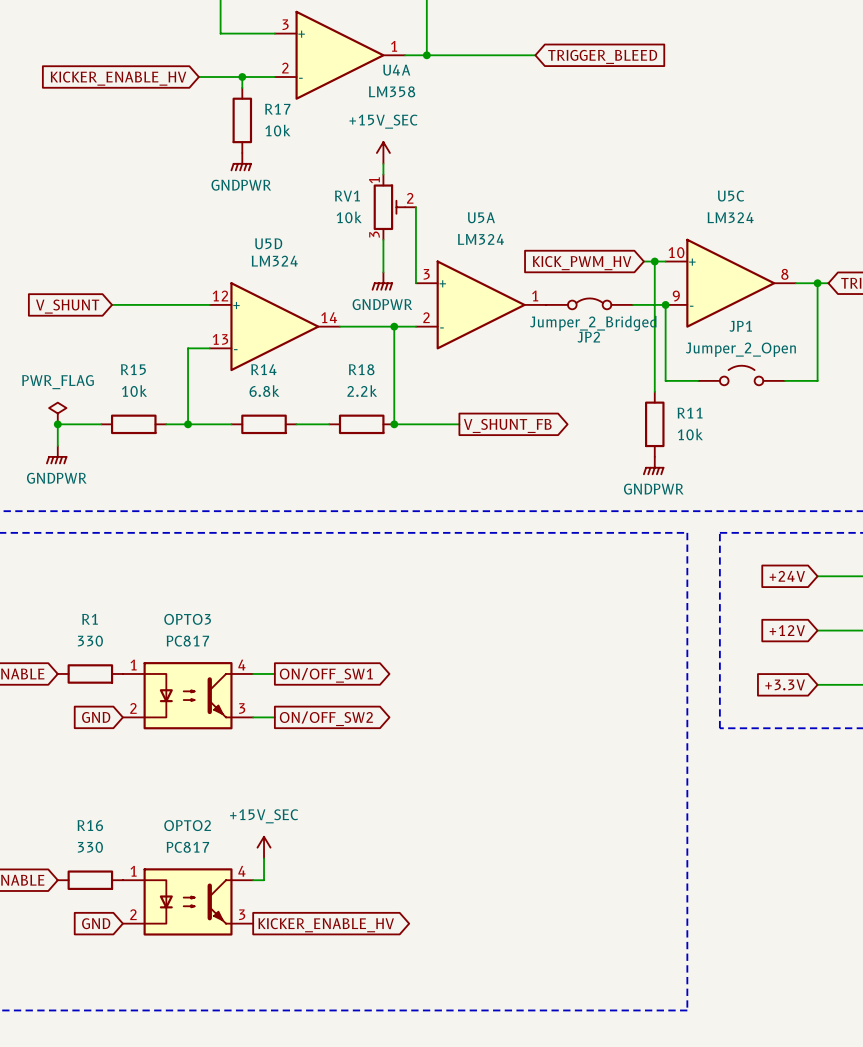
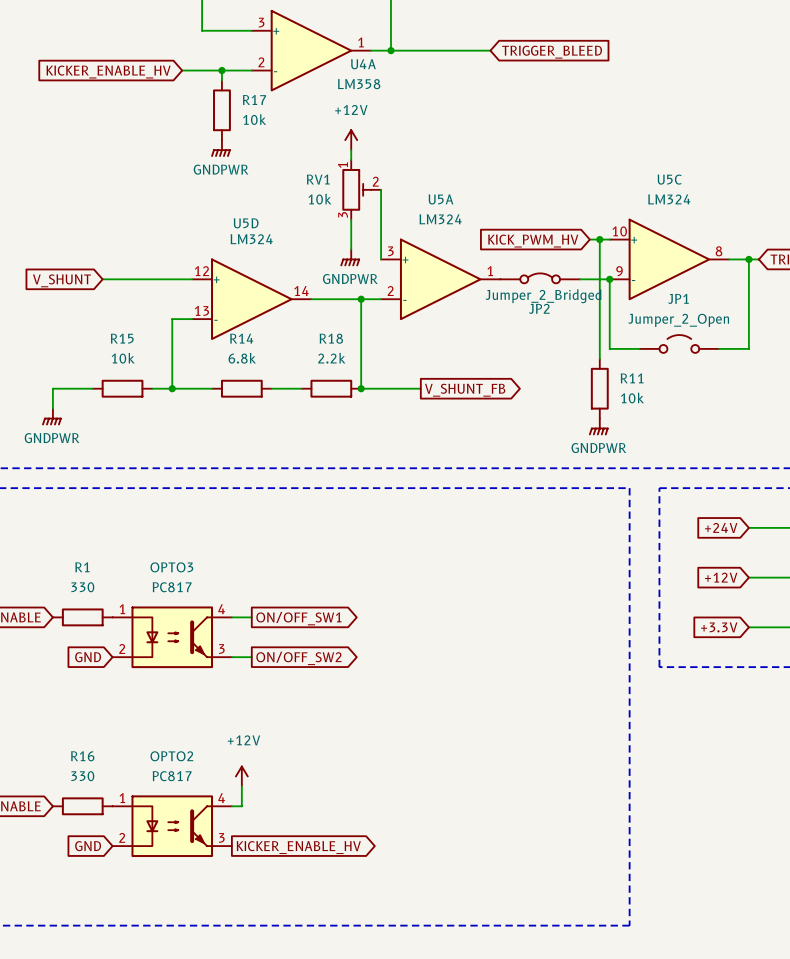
power symbol: +15V_SEC (383, 152) -> +12V (351, 140)
power symbol: PWR_FLAG (57, 413) -> none
junction: (57, 424) -> none
power symbol: +15V_SEC (264, 847) -> +12V (241, 776)

